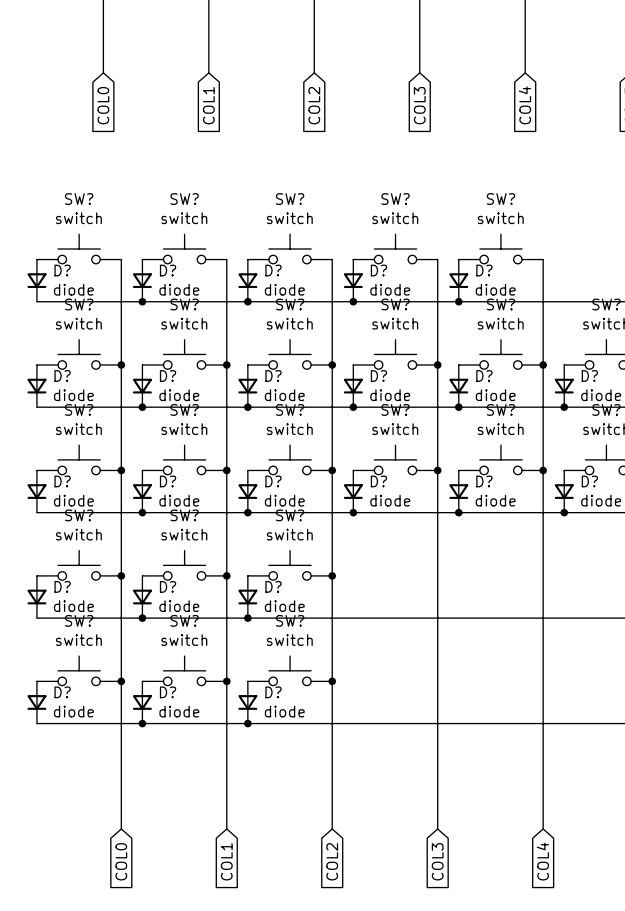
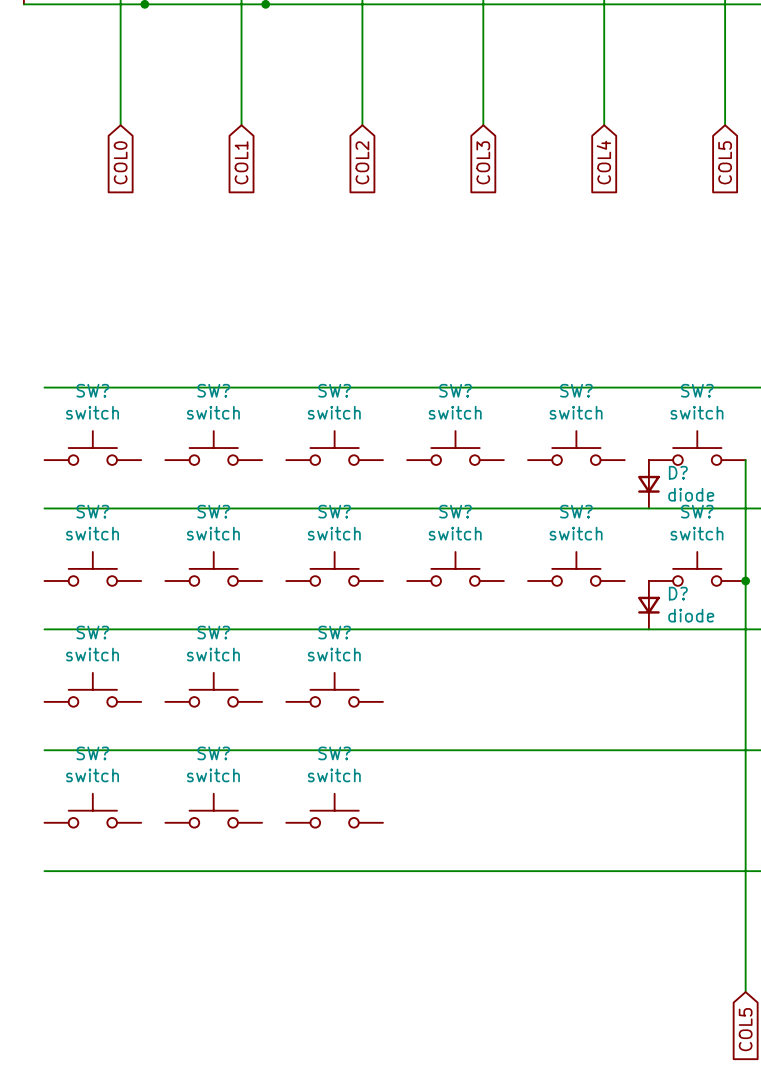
SW?: switch (79, 249) -> none
SW?: switch (184, 249) -> none
SW?: switch (290, 249) -> none
SW?: switch (395, 249) -> none
SW?: switch (500, 249) -> none
wire: (121, 259) (121, 829) -> none
wire: (226, 259) (226, 829) -> none
wire: (332, 259) (332, 829) -> none
wire: (437, 259) (437, 829) -> none
wire: (543, 259) (543, 829) -> none
D?: diode (36, 280) -> none
D?: diode (142, 280) -> none
D?: diode (247, 280) -> none
D?: diode (353, 280) -> none
D?: diode (458, 280) -> none
junction: (142, 301) -> none
junction: (247, 301) -> none
junction: (353, 301) -> none
junction: (458, 301) -> none
junction: (121, 365) -> none
junction: (226, 365) -> none
junction: (332, 365) -> none
junction: (437, 365) -> none
junction: (543, 365) -> none
D?: diode (36, 386) -> none
D?: diode (142, 386) -> none
D?: diode (247, 386) -> none
D?: diode (353, 386) -> none
D?: diode (458, 386) -> none
junction: (142, 407) -> none
junction: (247, 407) -> none
junction: (353, 407) -> none
junction: (458, 407) -> none
junction: (564, 407) -> none
junction: (121, 470) -> none
junction: (226, 470) -> none
junction: (332, 470) -> none
junction: (437, 470) -> none
junction: (543, 470) -> none
D?: diode (36, 491) -> none
D?: diode (142, 491) -> none
D?: diode (247, 491) -> none
D?: diode (353, 491) -> none
D?: diode (458, 491) -> none
junction: (142, 512) -> none
junction: (247, 512) -> none
junction: (353, 512) -> none
junction: (458, 512) -> none
junction: (564, 512) -> none
junction: (121, 575) -> none
junction: (226, 575) -> none
junction: (332, 575) -> none
D?: diode (36, 597) -> none
D?: diode (142, 597) -> none
D?: diode (247, 597) -> none
junction: (142, 618) -> none
junction: (247, 618) -> none
junction: (121, 681) -> none
junction: (226, 681) -> none
junction: (332, 681) -> none
D?: diode (36, 702) -> none
D?: diode (142, 702) -> none
D?: diode (247, 702) -> none
junction: (142, 723) -> none
junction: (247, 723) -> none
global label: COL0 (121, 861) -> none
global label: COL1 (226, 861) -> none
global label: COL2 (332, 861) -> none
global label: COL3 (437, 861) -> none
global label: COL4 (542, 861) -> none

